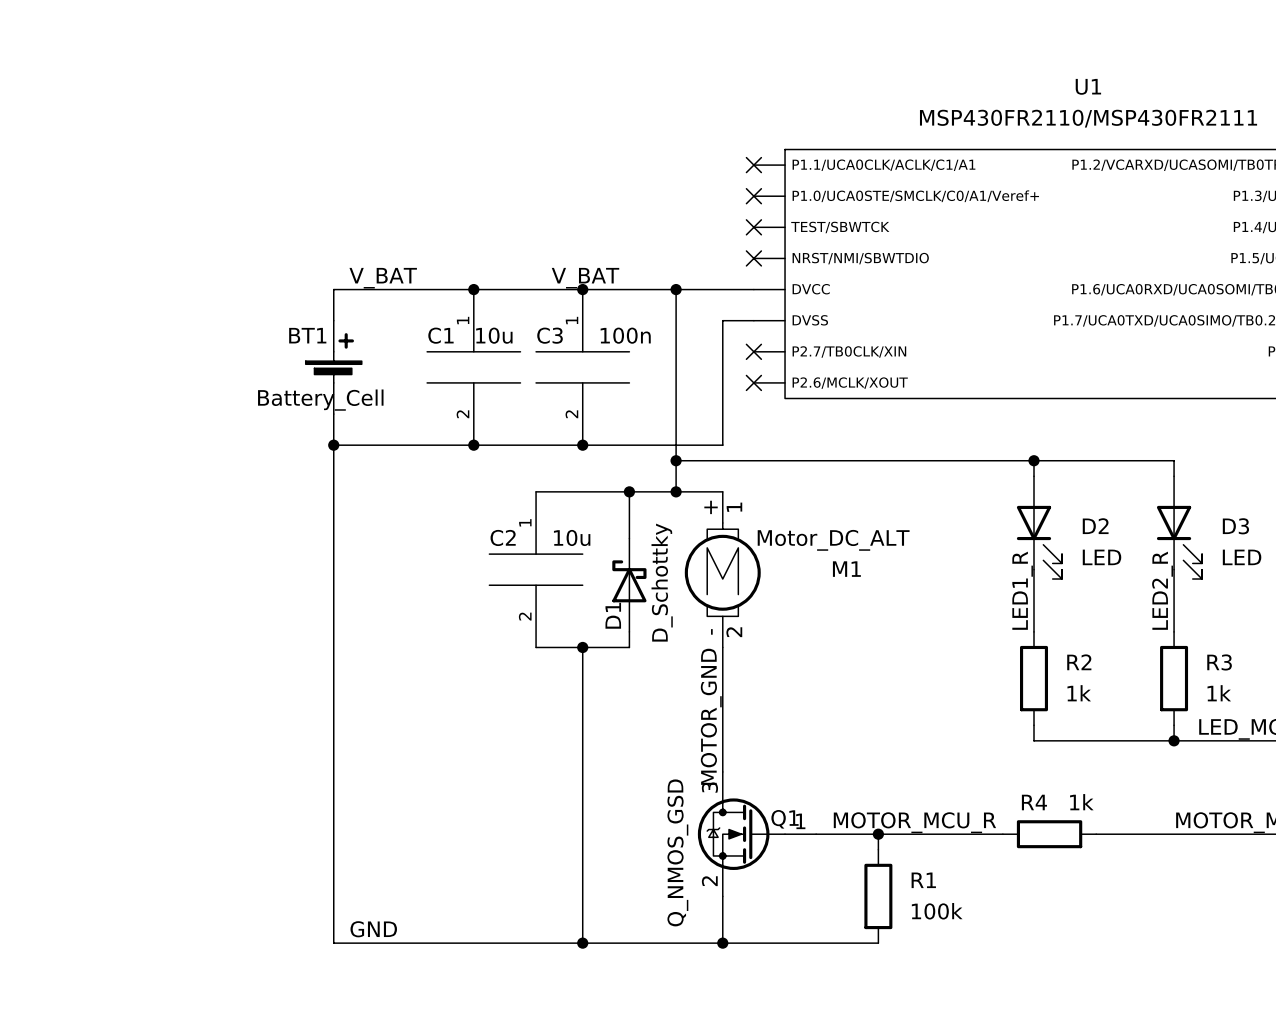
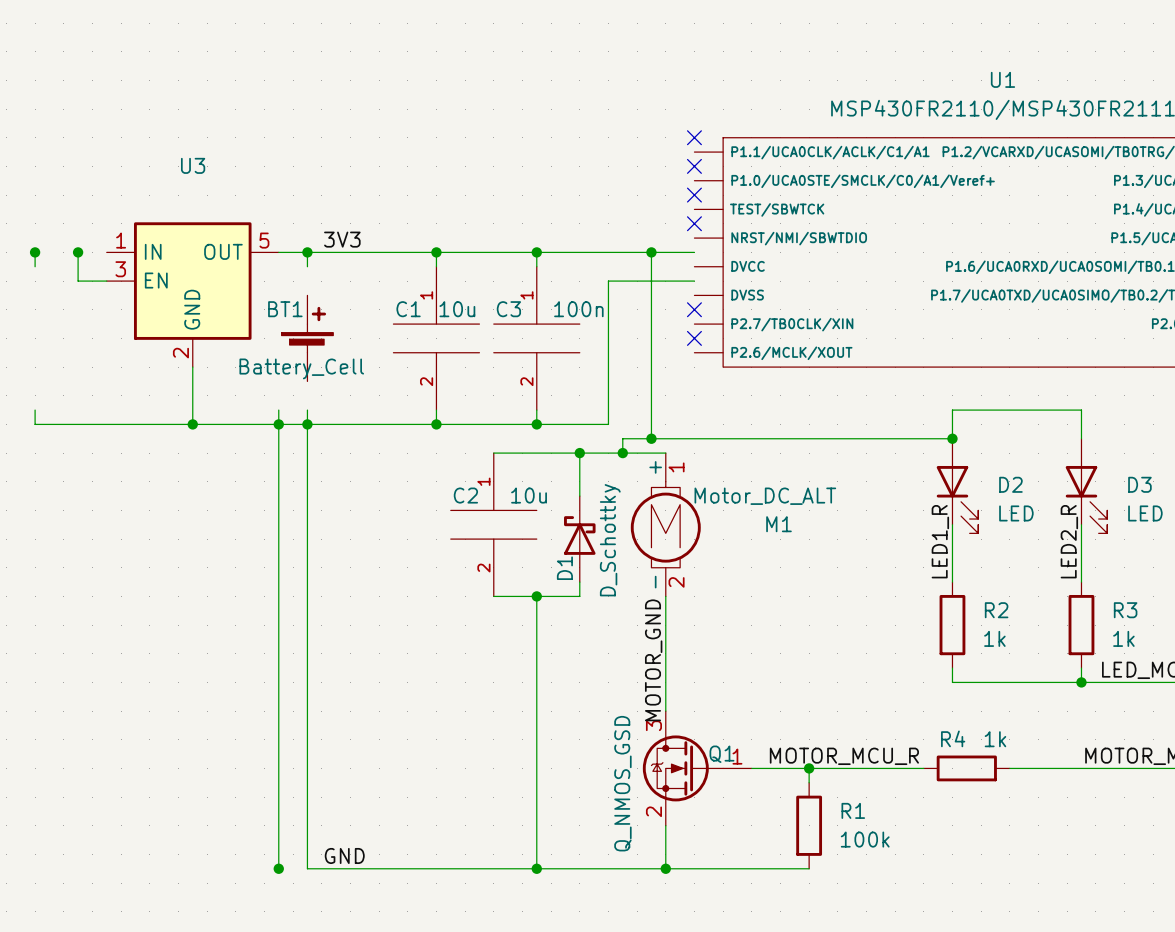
no-connect mark: none -> (694, 137)
no-connect mark: (753, 165) -> none
no-connect mark: none -> (694, 166)
no-connect mark: (753, 196) -> none
no-connect mark: none -> (694, 195)
no-connect mark: (753, 227) -> none
no-connect mark: none -> (694, 223)
no-connect mark: (753, 258) -> none
label: none -> 3V3 (342, 239)
wire: none -> (35, 252) (35, 266)
junction: none -> (35, 252)
wire: none -> (78, 252) (78, 281) (106, 281)
junction: none -> (78, 252)
wire: none -> (278, 252) (694, 252)
wire: none -> (307, 252) (307, 266)
junction: none -> (307, 252)
wire: none -> (436, 252) (436, 266)
wire: none -> (651, 252) (651, 438)
label: V_BAT (383, 278) -> none
label: V_BAT (585, 278) -> none
junction position: (473, 289) -> (436, 252)
junction position: (582, 289) -> (536, 252)
wire: (676, 289) (676, 476) -> (952, 438) (622, 438)
junction position: (676, 289) -> (651, 252)
wire: (753, 289) (333, 289) (333, 320) -> none
wire: none -> (694, 281) (608, 281) (608, 424) (35, 424) (35, 410)
U3: none -> (192, 294)
wire: (753, 320) (722, 320) (722, 445) (333, 445) (333, 414) -> none
no-connect mark: none -> (694, 309)
no-connect mark: (753, 351) -> none
no-connect mark: none -> (694, 338)
no-connect mark: (753, 382) -> none
wire: none -> (192, 367) (192, 424)
wire: none -> (278, 410) (278, 868)
junction position: (333, 445) -> (307, 424)
wire: none -> (436, 410) (436, 424)
junction position: (473, 445) -> (436, 424)
wire: none -> (536, 410) (536, 424)
junction position: (582, 445) -> (536, 424)
junction: none -> (192, 424)
junction: none -> (278, 424)
wire: (676, 460) (1174, 460) -> (952, 424) (952, 410) (1081, 410) (1081, 424)
junction position: (676, 460) -> (651, 438)
junction position: (1034, 460) -> (952, 438)
junction: none -> (278, 868)

